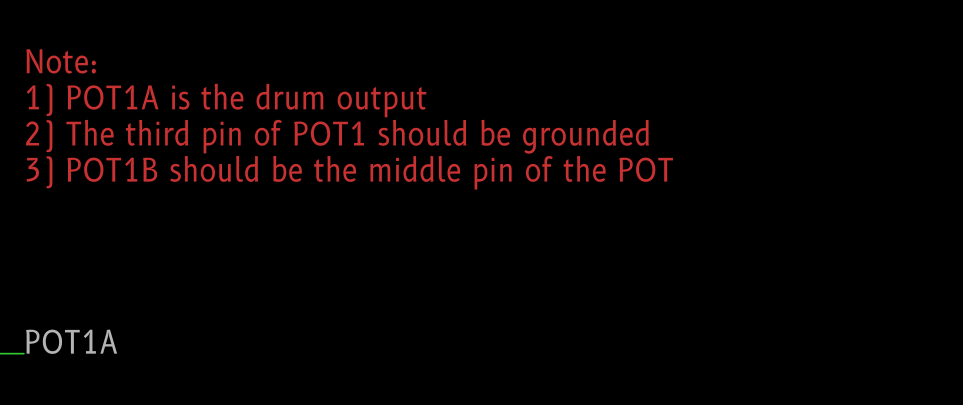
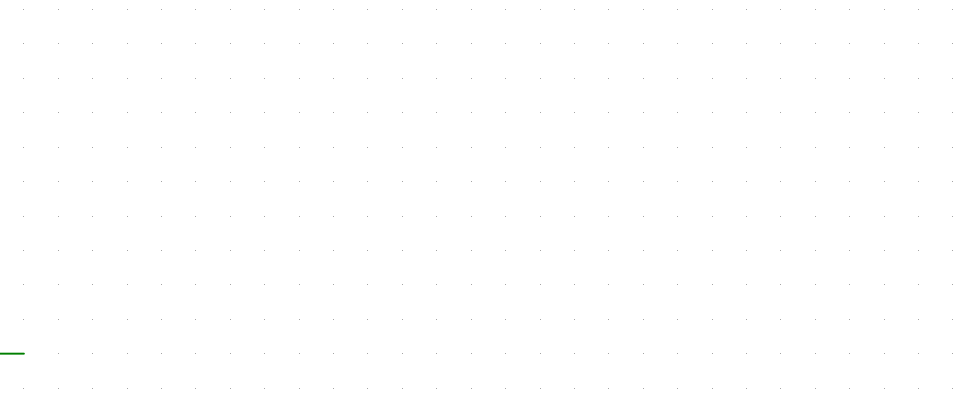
text: Note: (61, 61) -> none
text: 1) POT1A is the drum output (226, 100) -> none
text: 2) The third pin of POT1 should be grounded (337, 136) -> none
text: 3) POT1B should be the middle pin of the POT (349, 172) -> none
label: POT1A (71, 341) -> none

